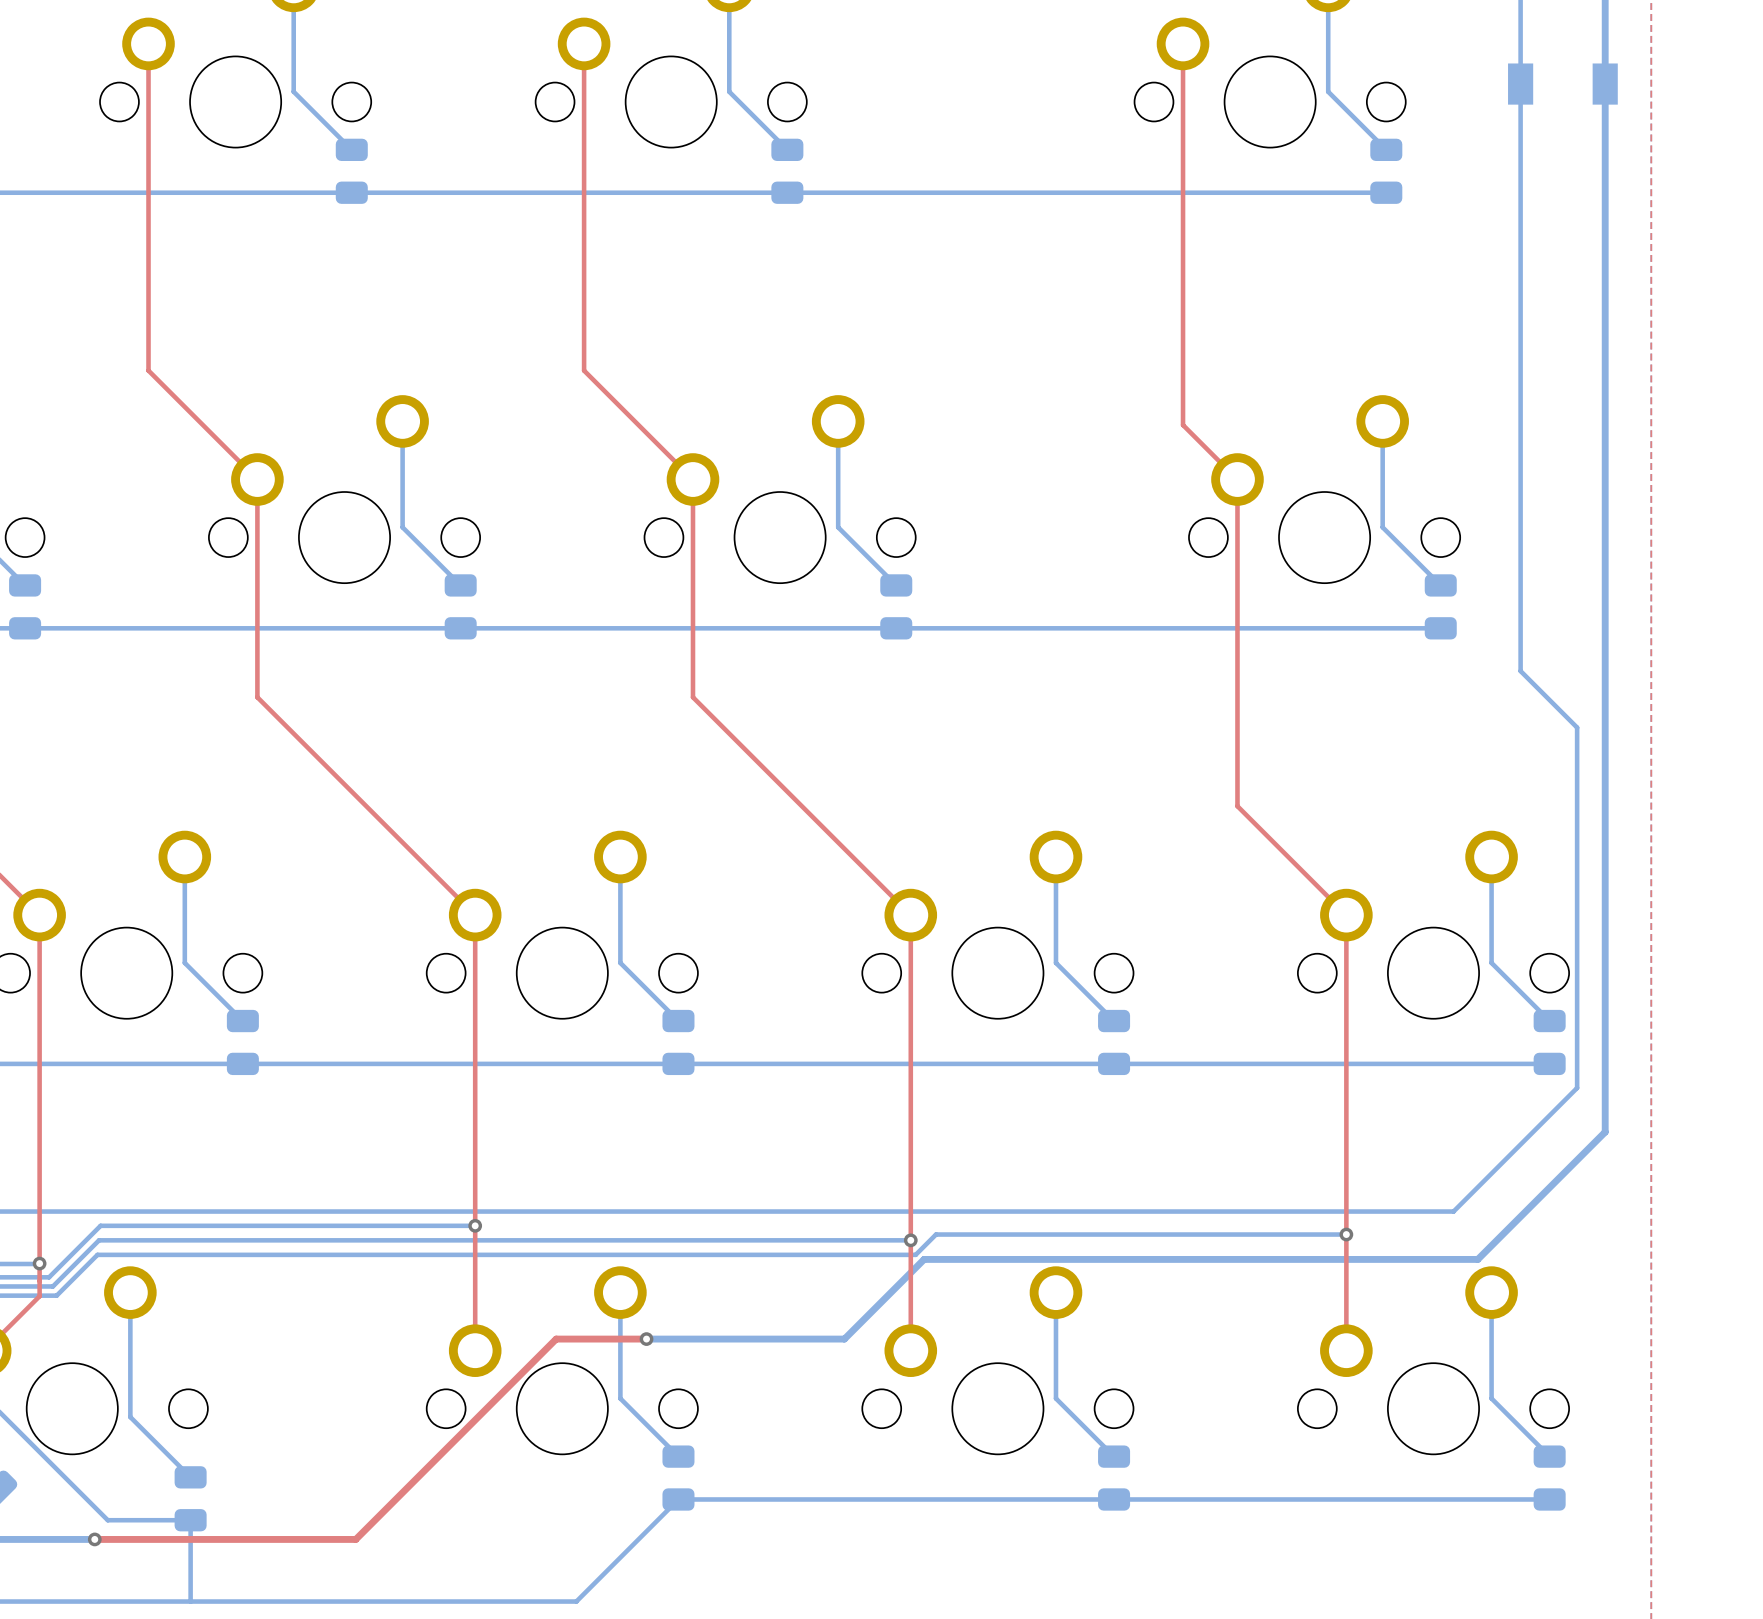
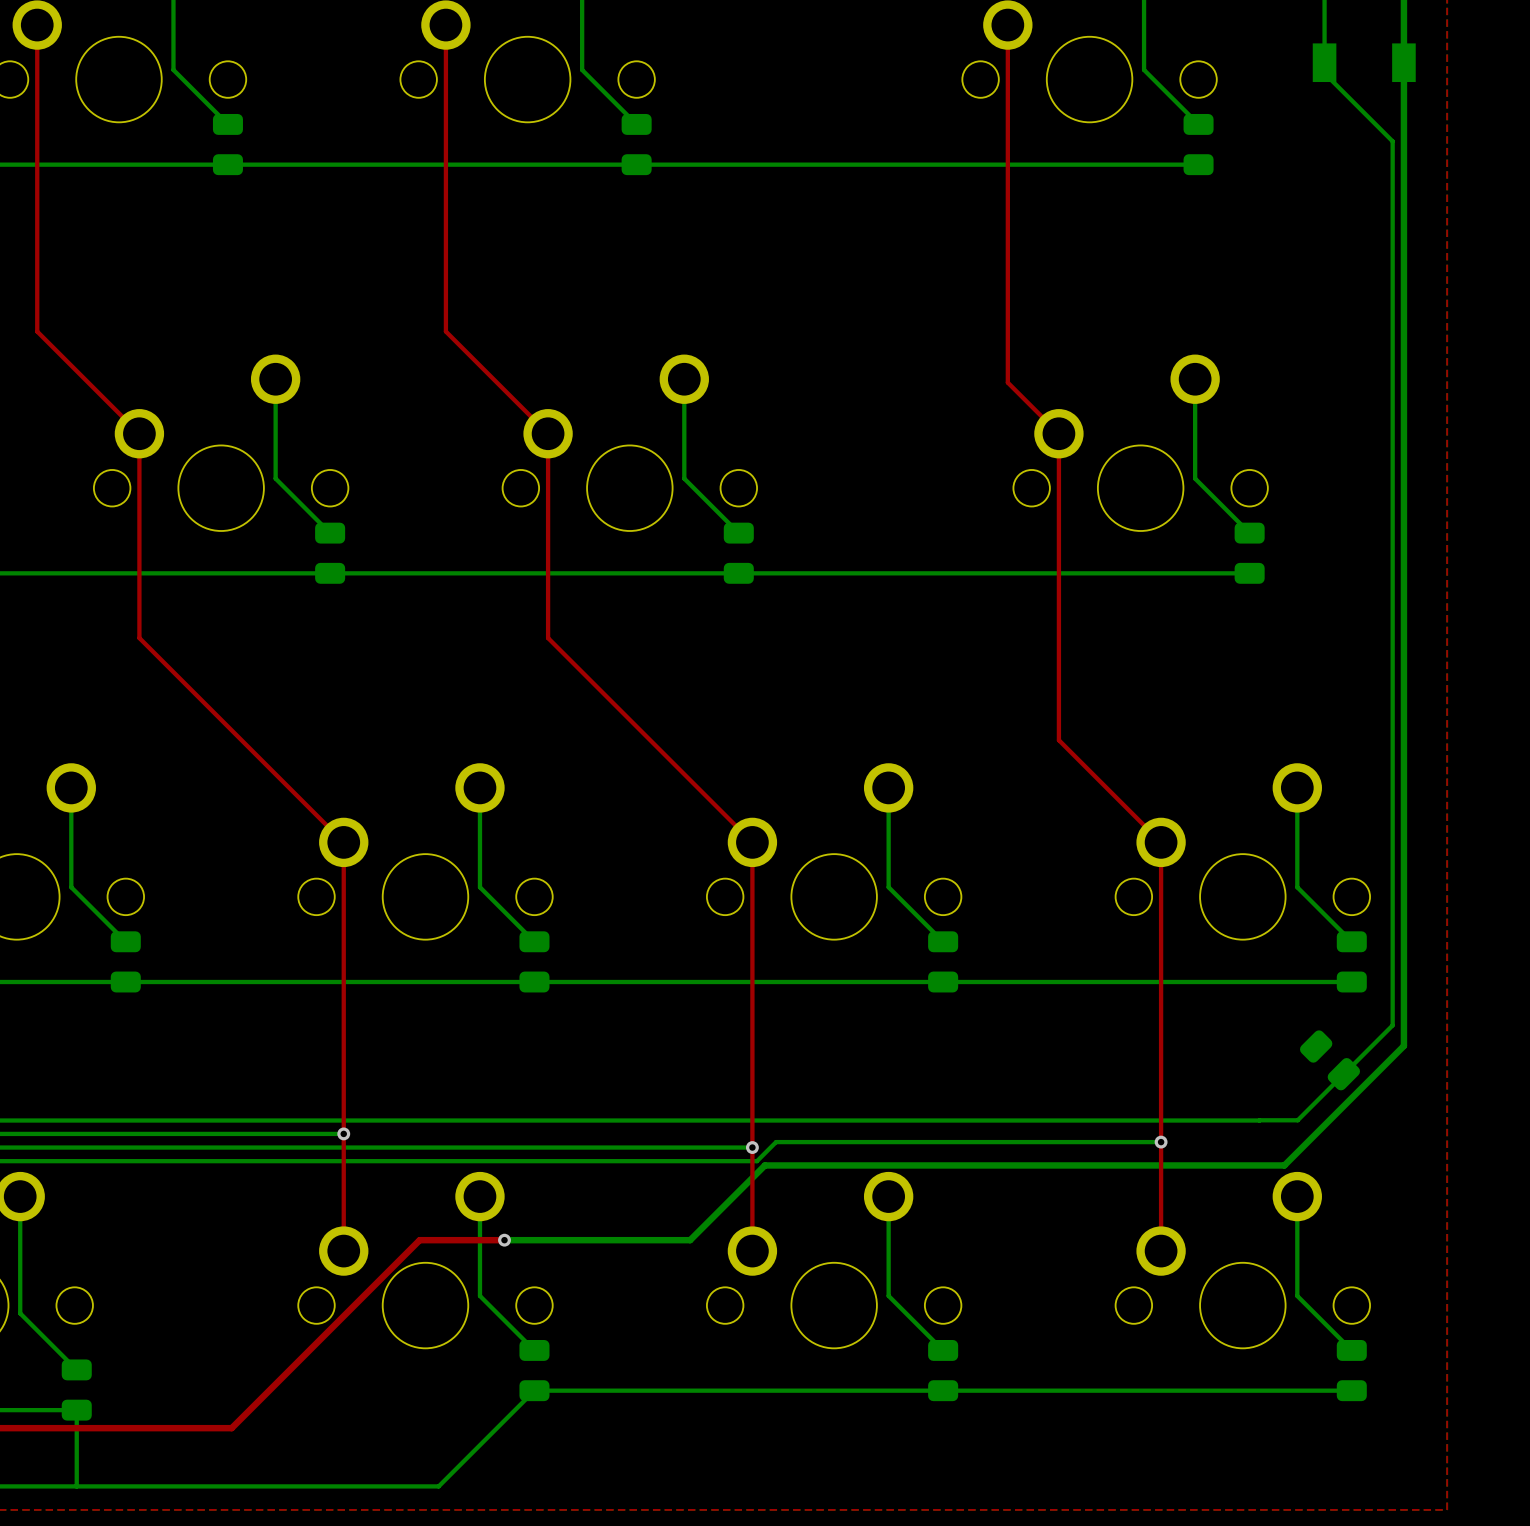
bottom track: (1520, 95) (1520, 671) (1577, 727) (1577, 1087) (1453, 1211) (1451, 1211) -> (1324, 73) (1392, 141) (1392, 1025) (1297, 1120) (1259, 1120)
part: none -> (1330, 1060)

